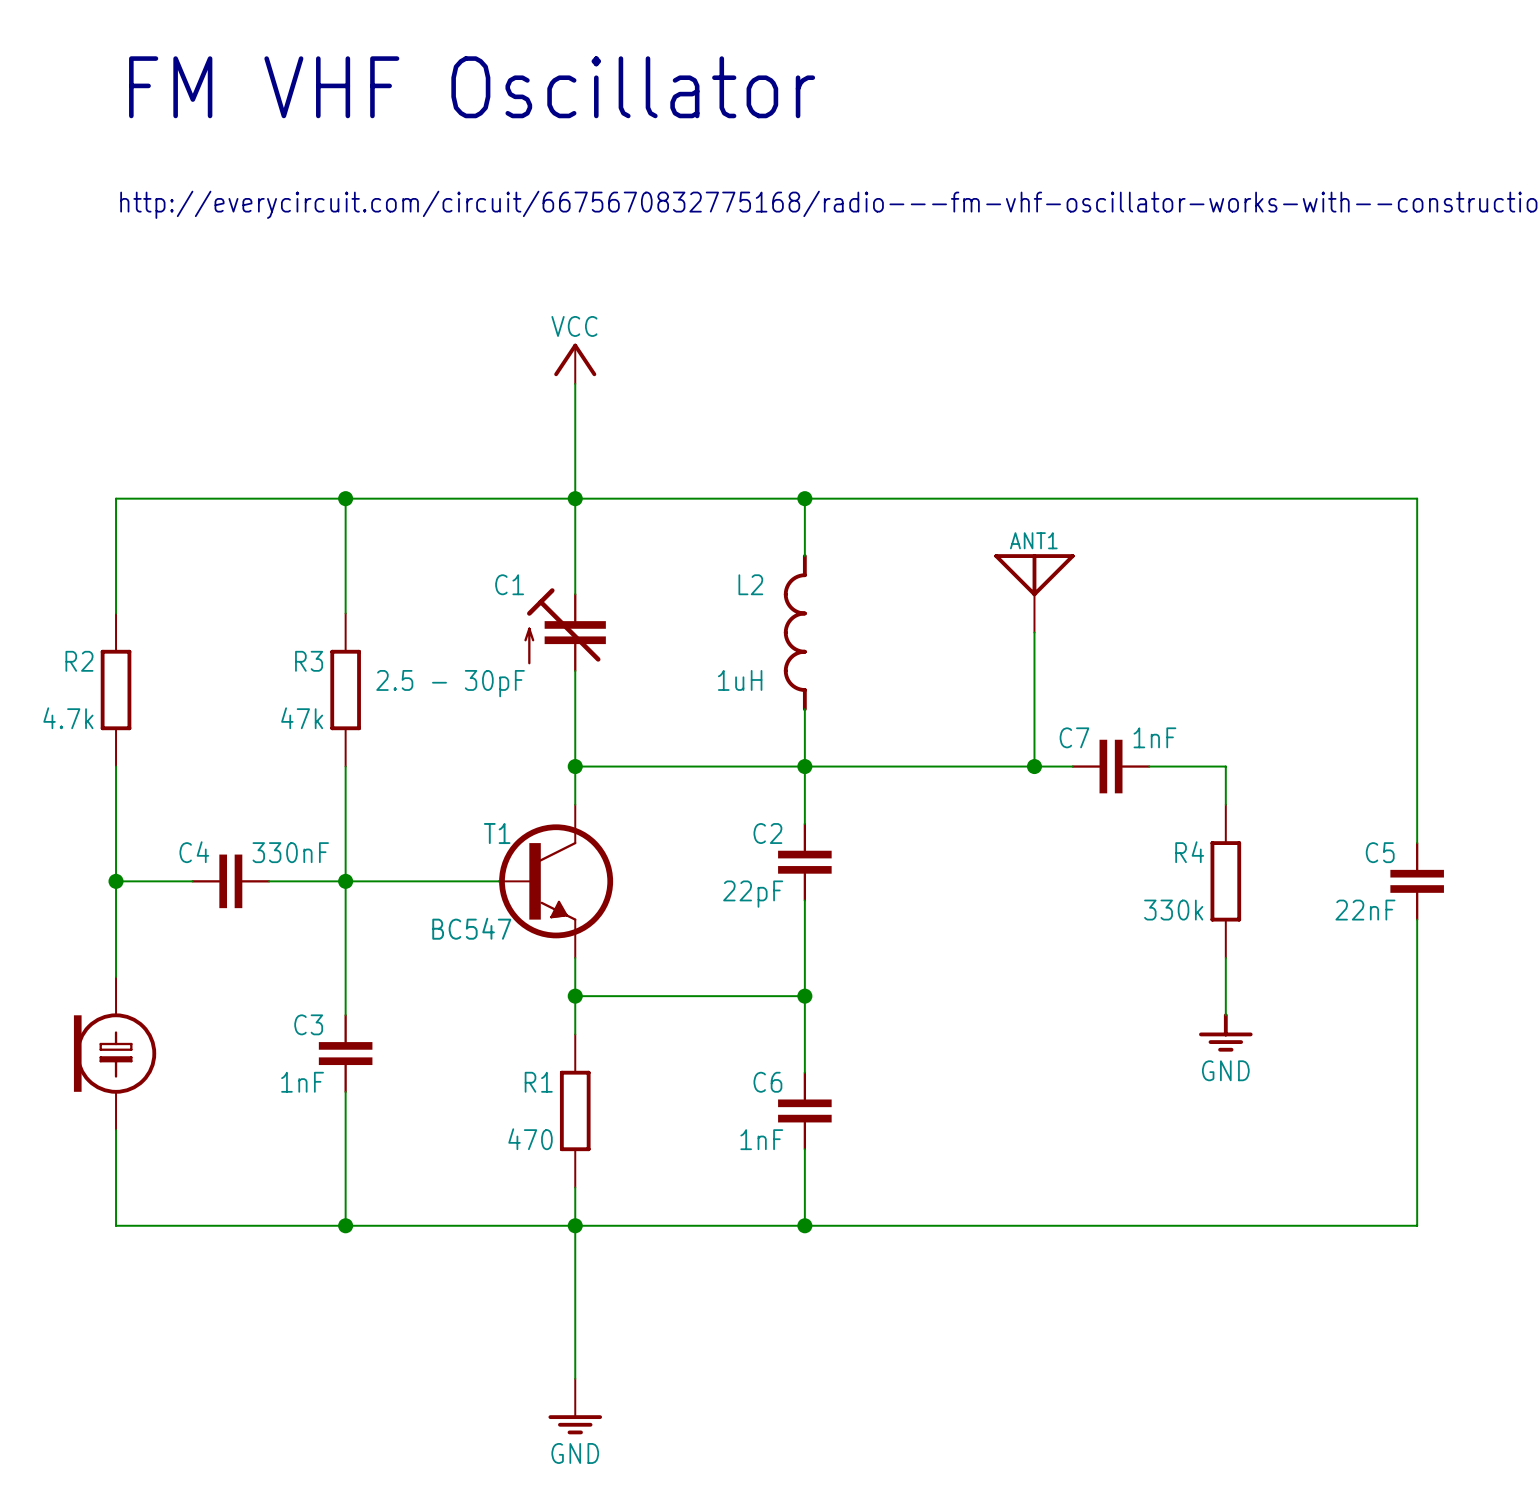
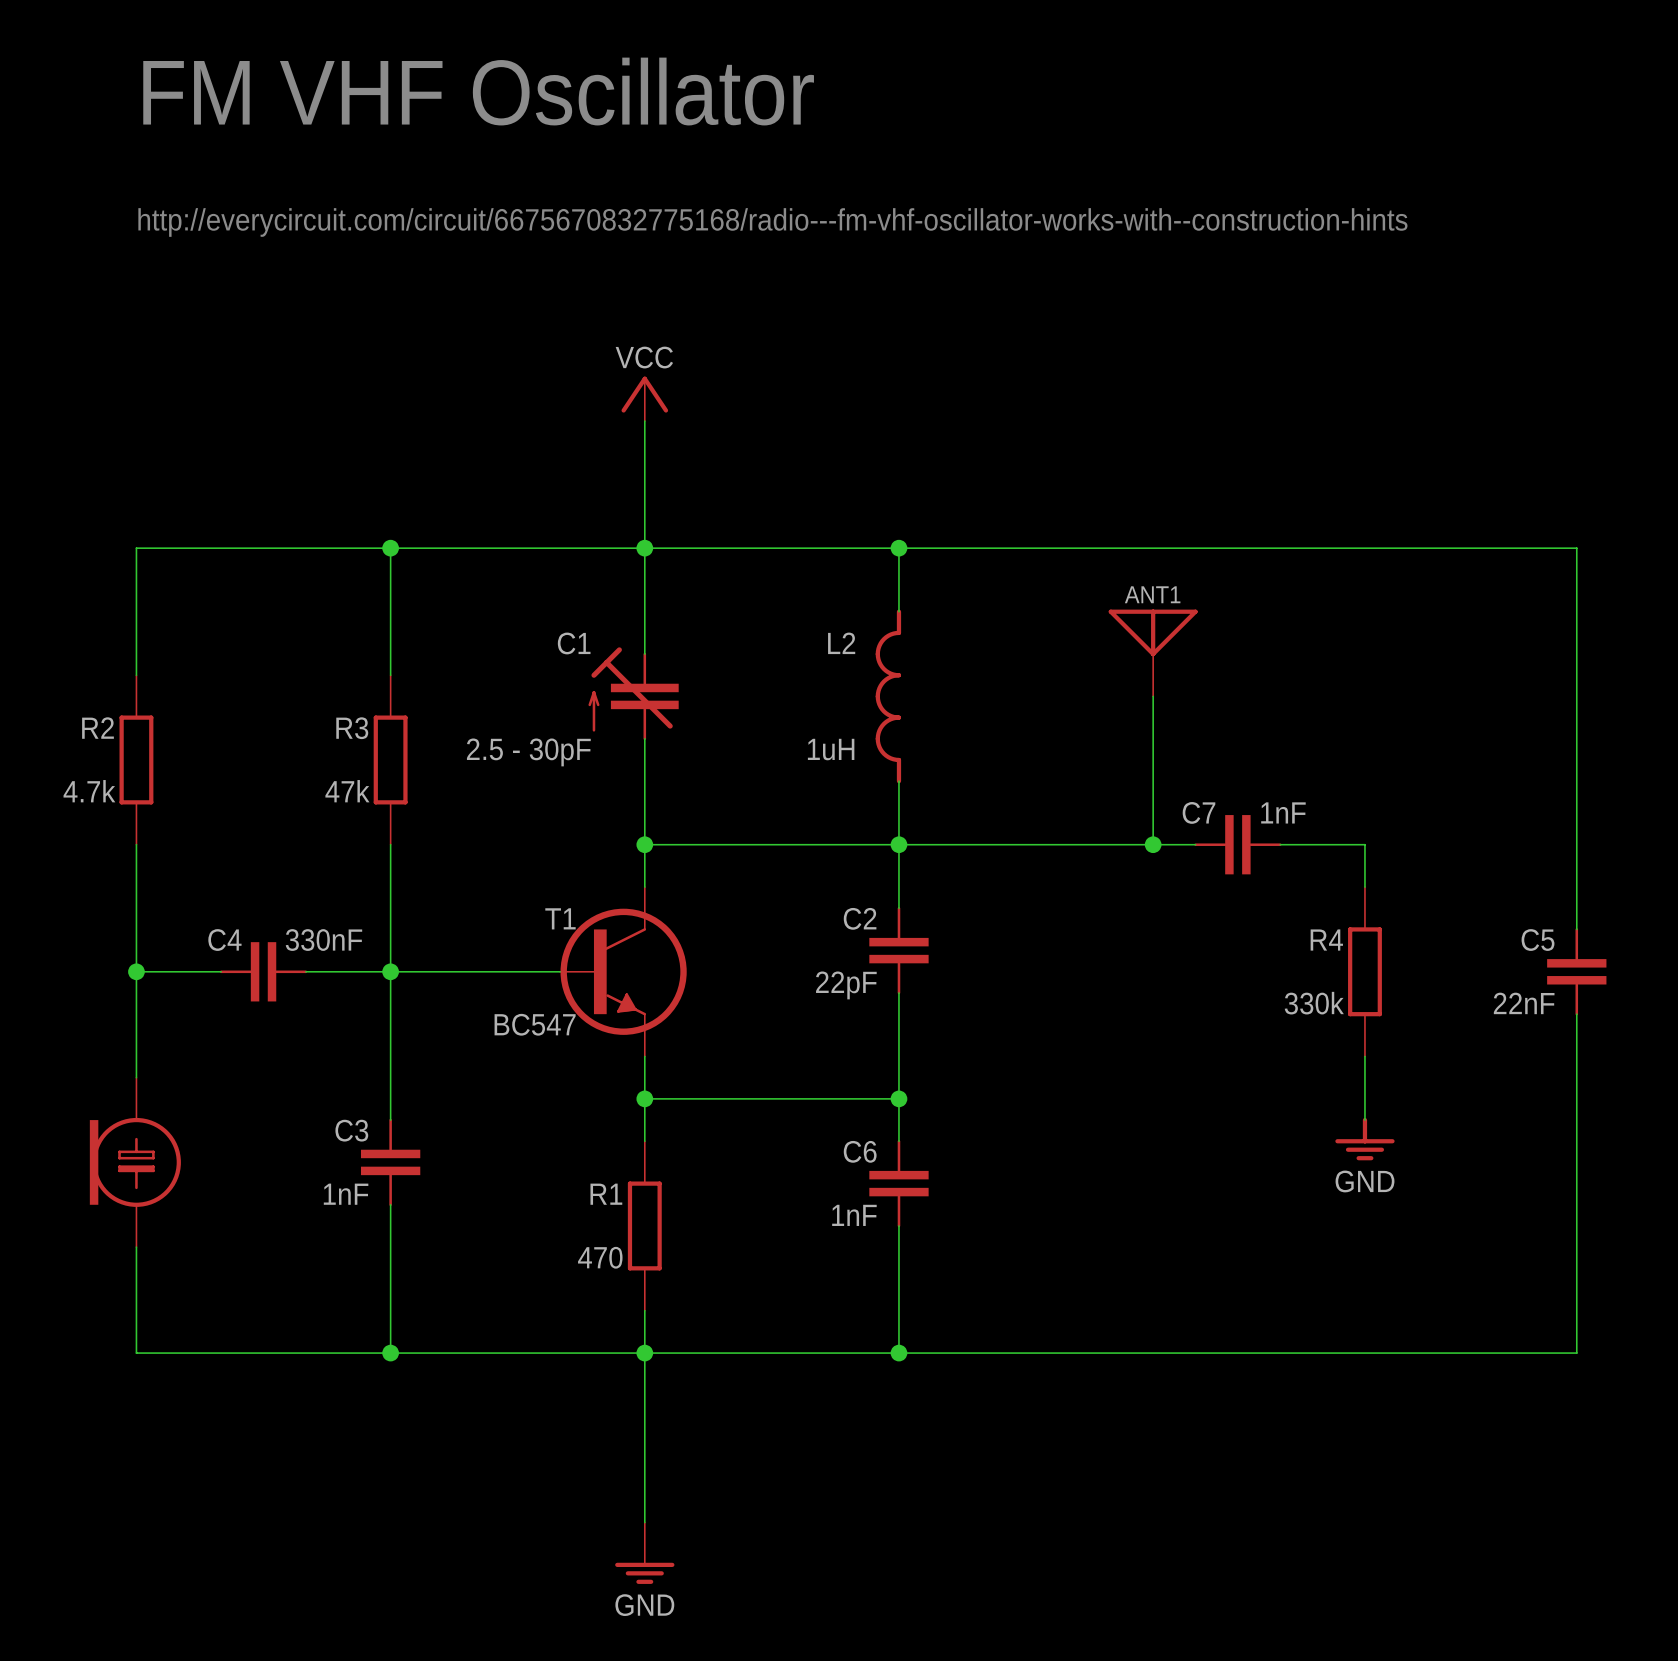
C6 position: (804, 1110) -> (898, 1183)

